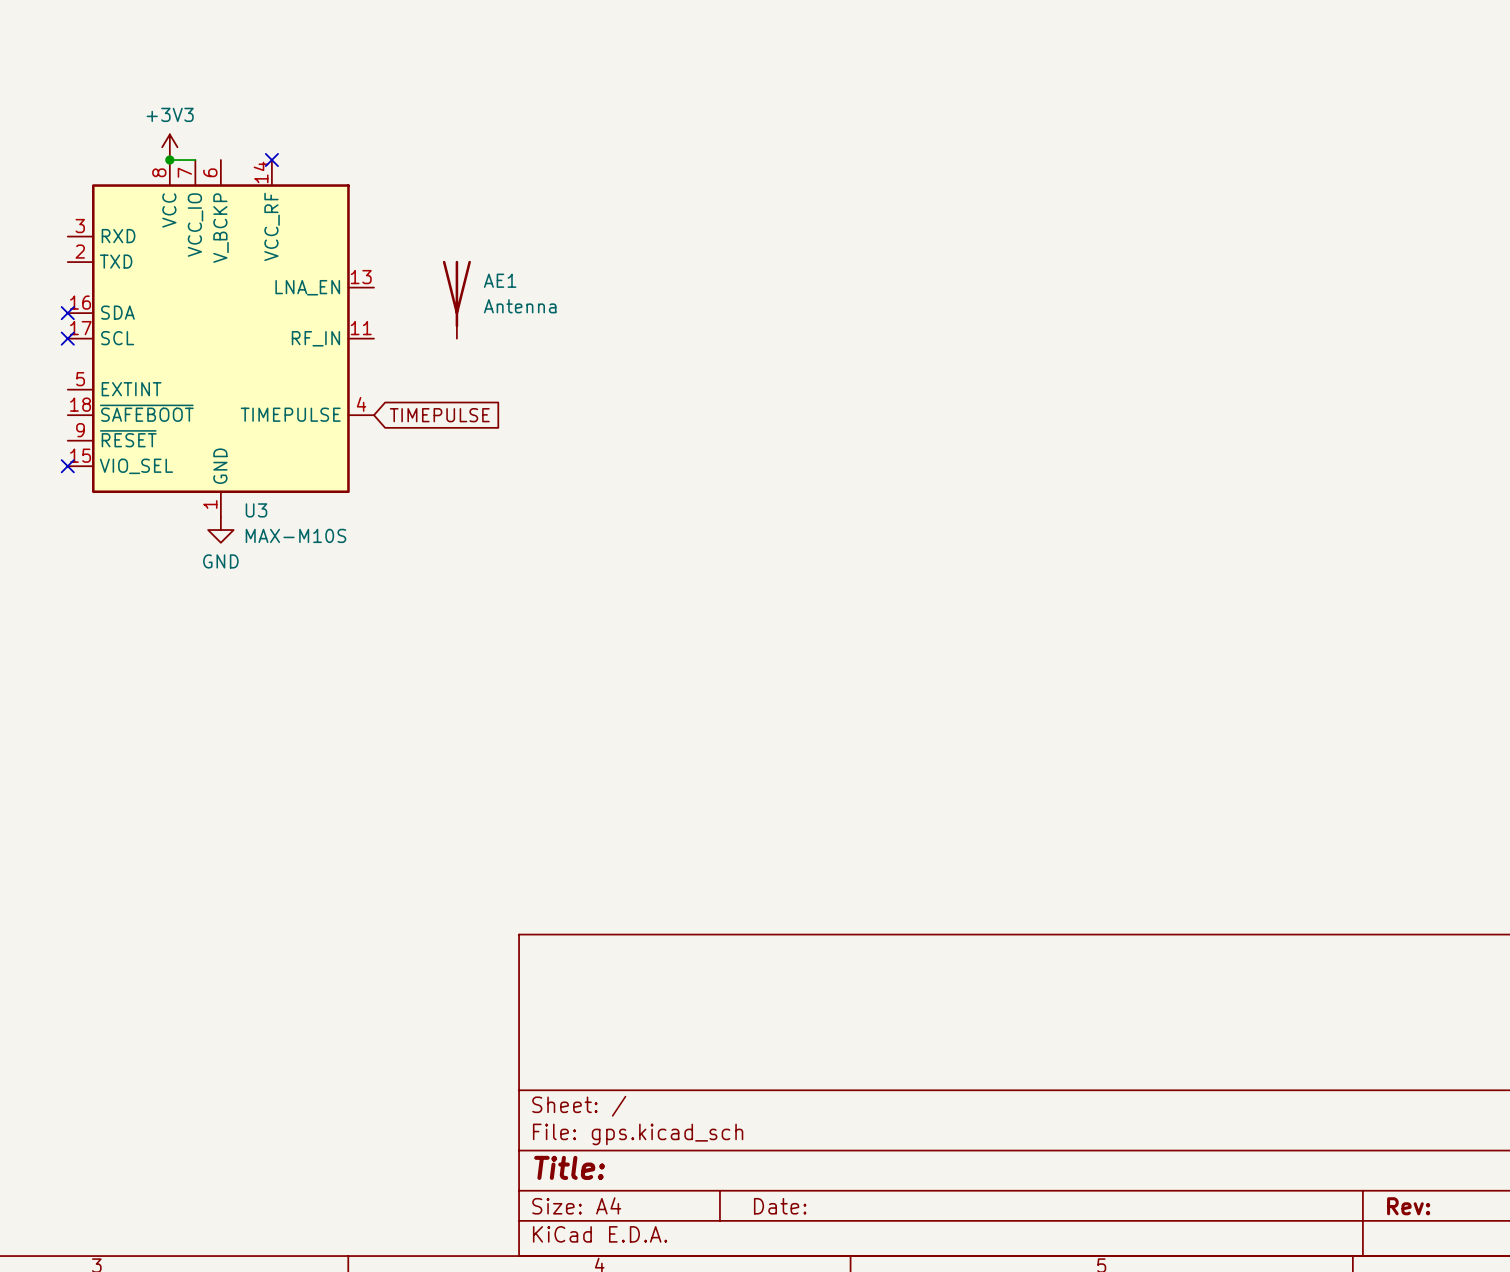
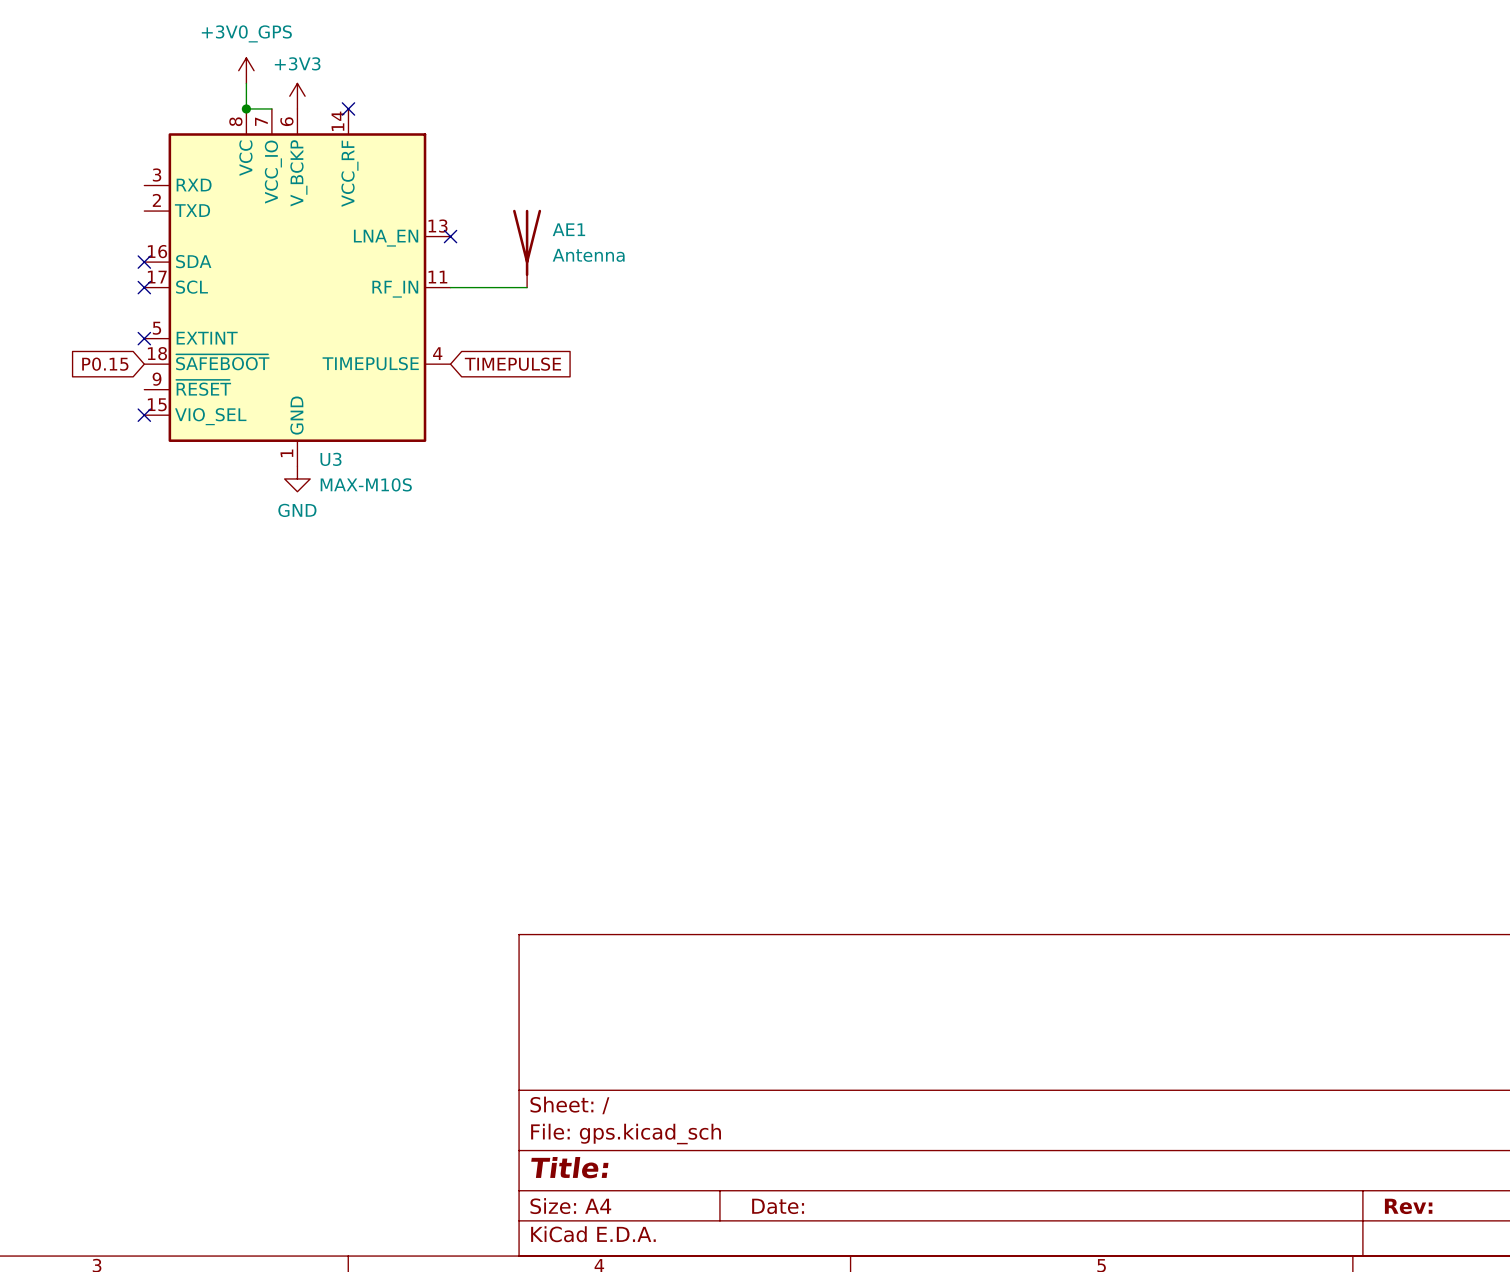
power symbol: none -> +3V0_GPS (246, 70)
wire: none -> (246, 83) (246, 108) (271, 108)
junction: none -> (246, 108)
no-connect mark: none -> (348, 108)
power symbol position: +3V3 (169, 147) -> +3V3 (297, 96)
junction: (169, 160) -> none
no-connect mark: (271, 160) -> none
no-connect mark: none -> (450, 236)
no-connect mark: none -> (144, 262)
no-connect mark: none -> (144, 287)
wire: none -> (450, 287) (527, 287)
AE1 position: (456, 299) -> (527, 248)
no-connect mark: (67, 313) -> none
no-connect mark: (67, 338) -> none
no-connect mark: none -> (144, 338)
U3 position: (220, 338) -> (297, 287)
global label: none -> P0.15 (105, 364)
no-connect mark: none -> (144, 415)
global label position: TIMEPULSE (439, 415) -> TIMEPULSE (512, 364)
no-connect mark: (67, 466) -> none
power symbol position: GND (220, 530) -> GND (297, 478)

